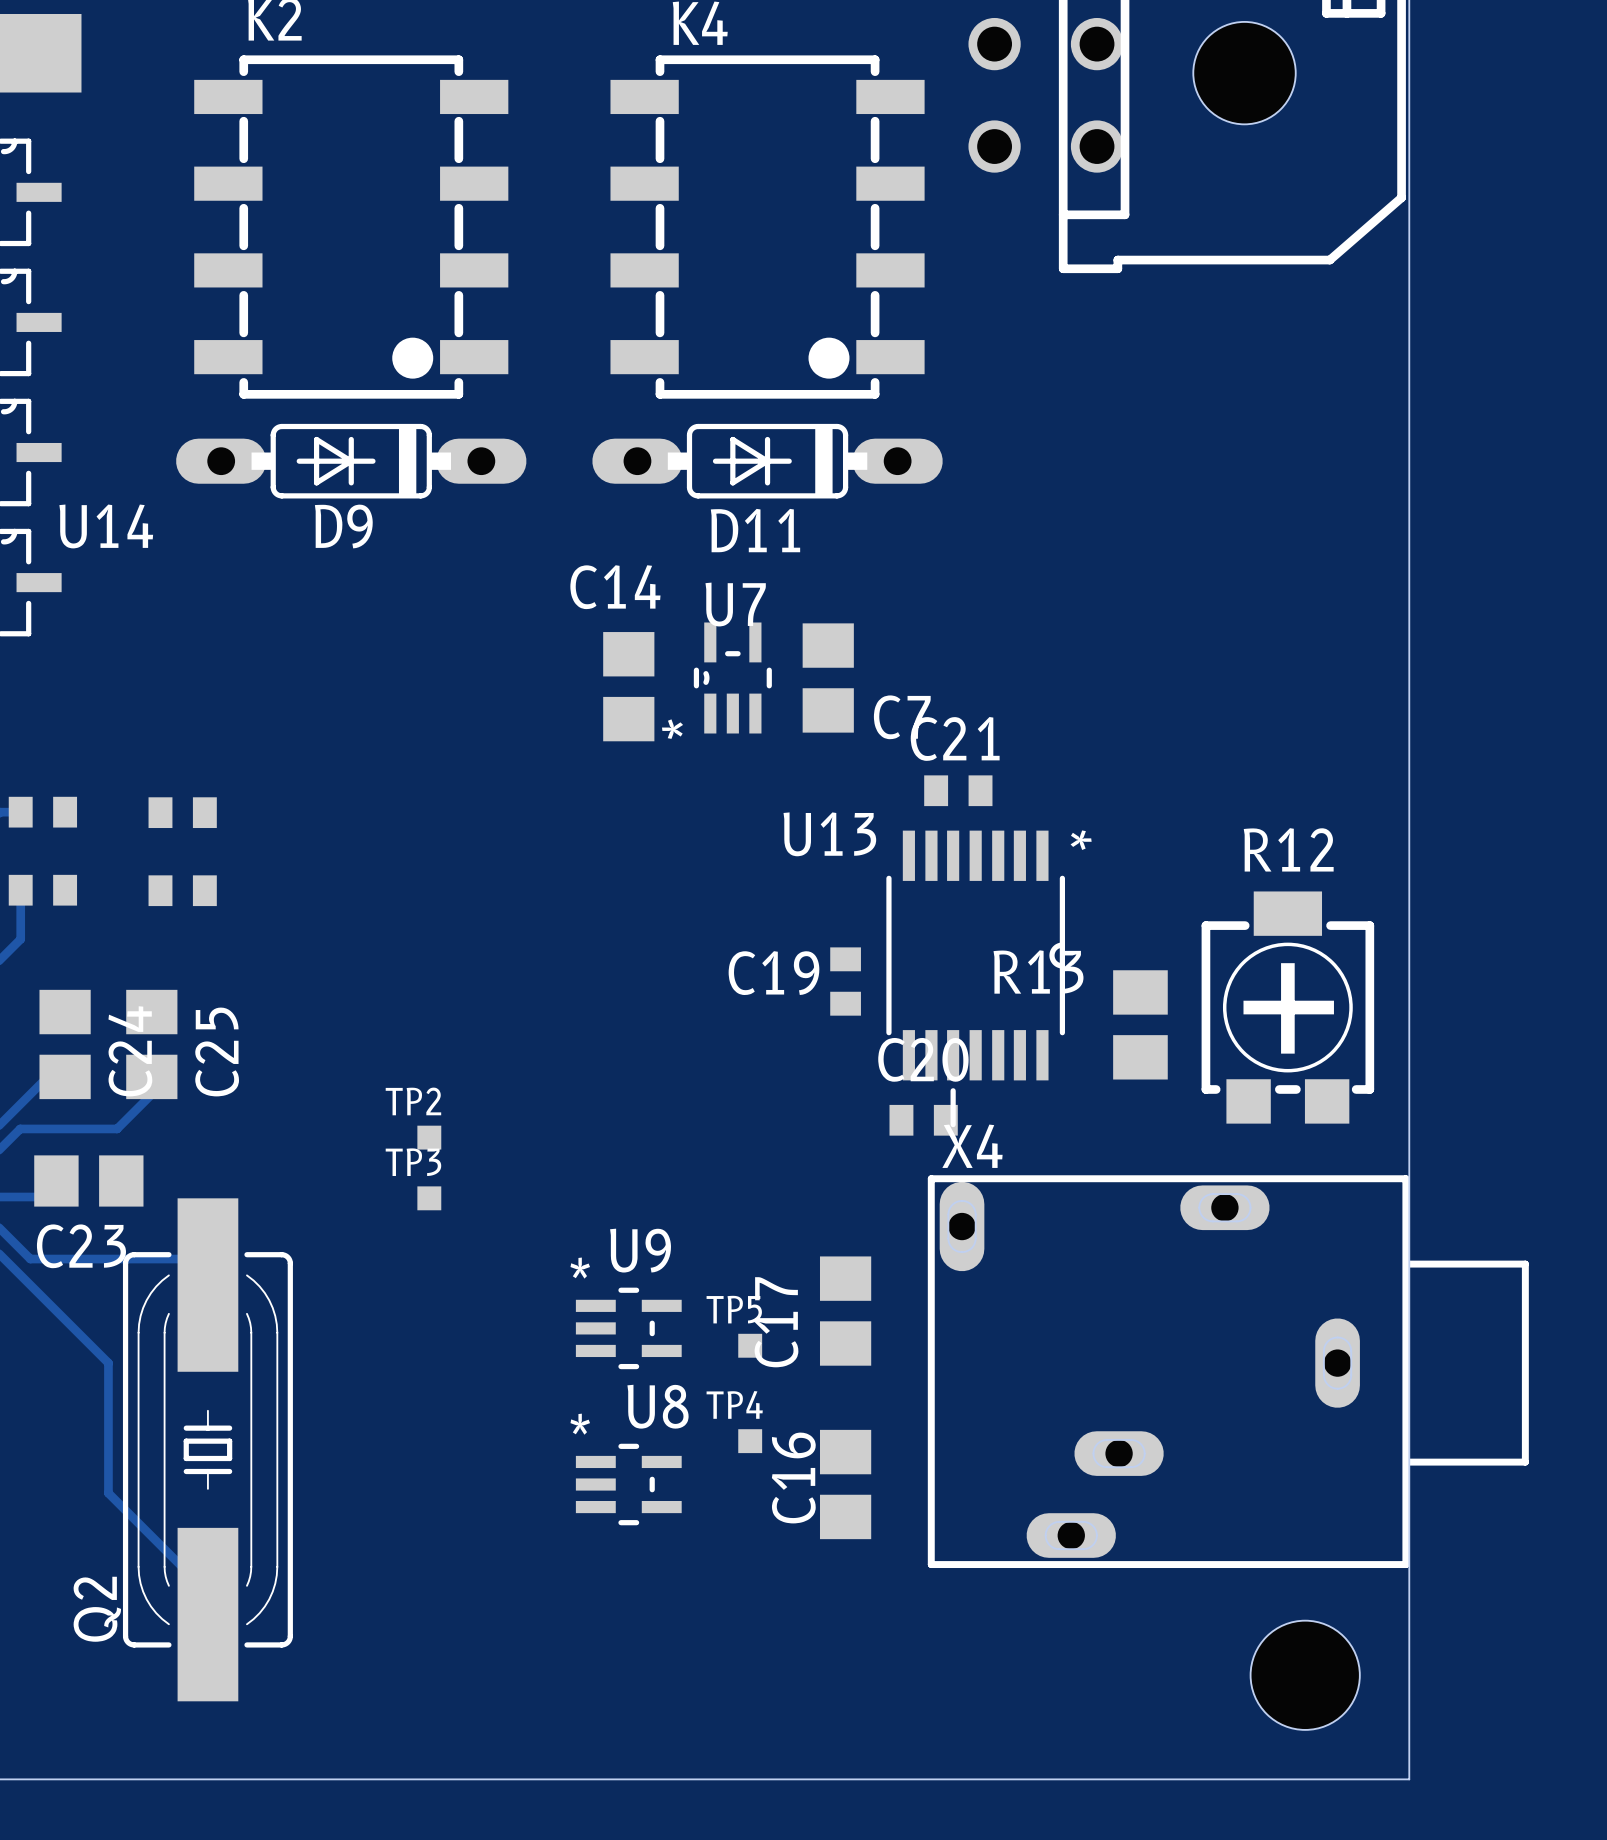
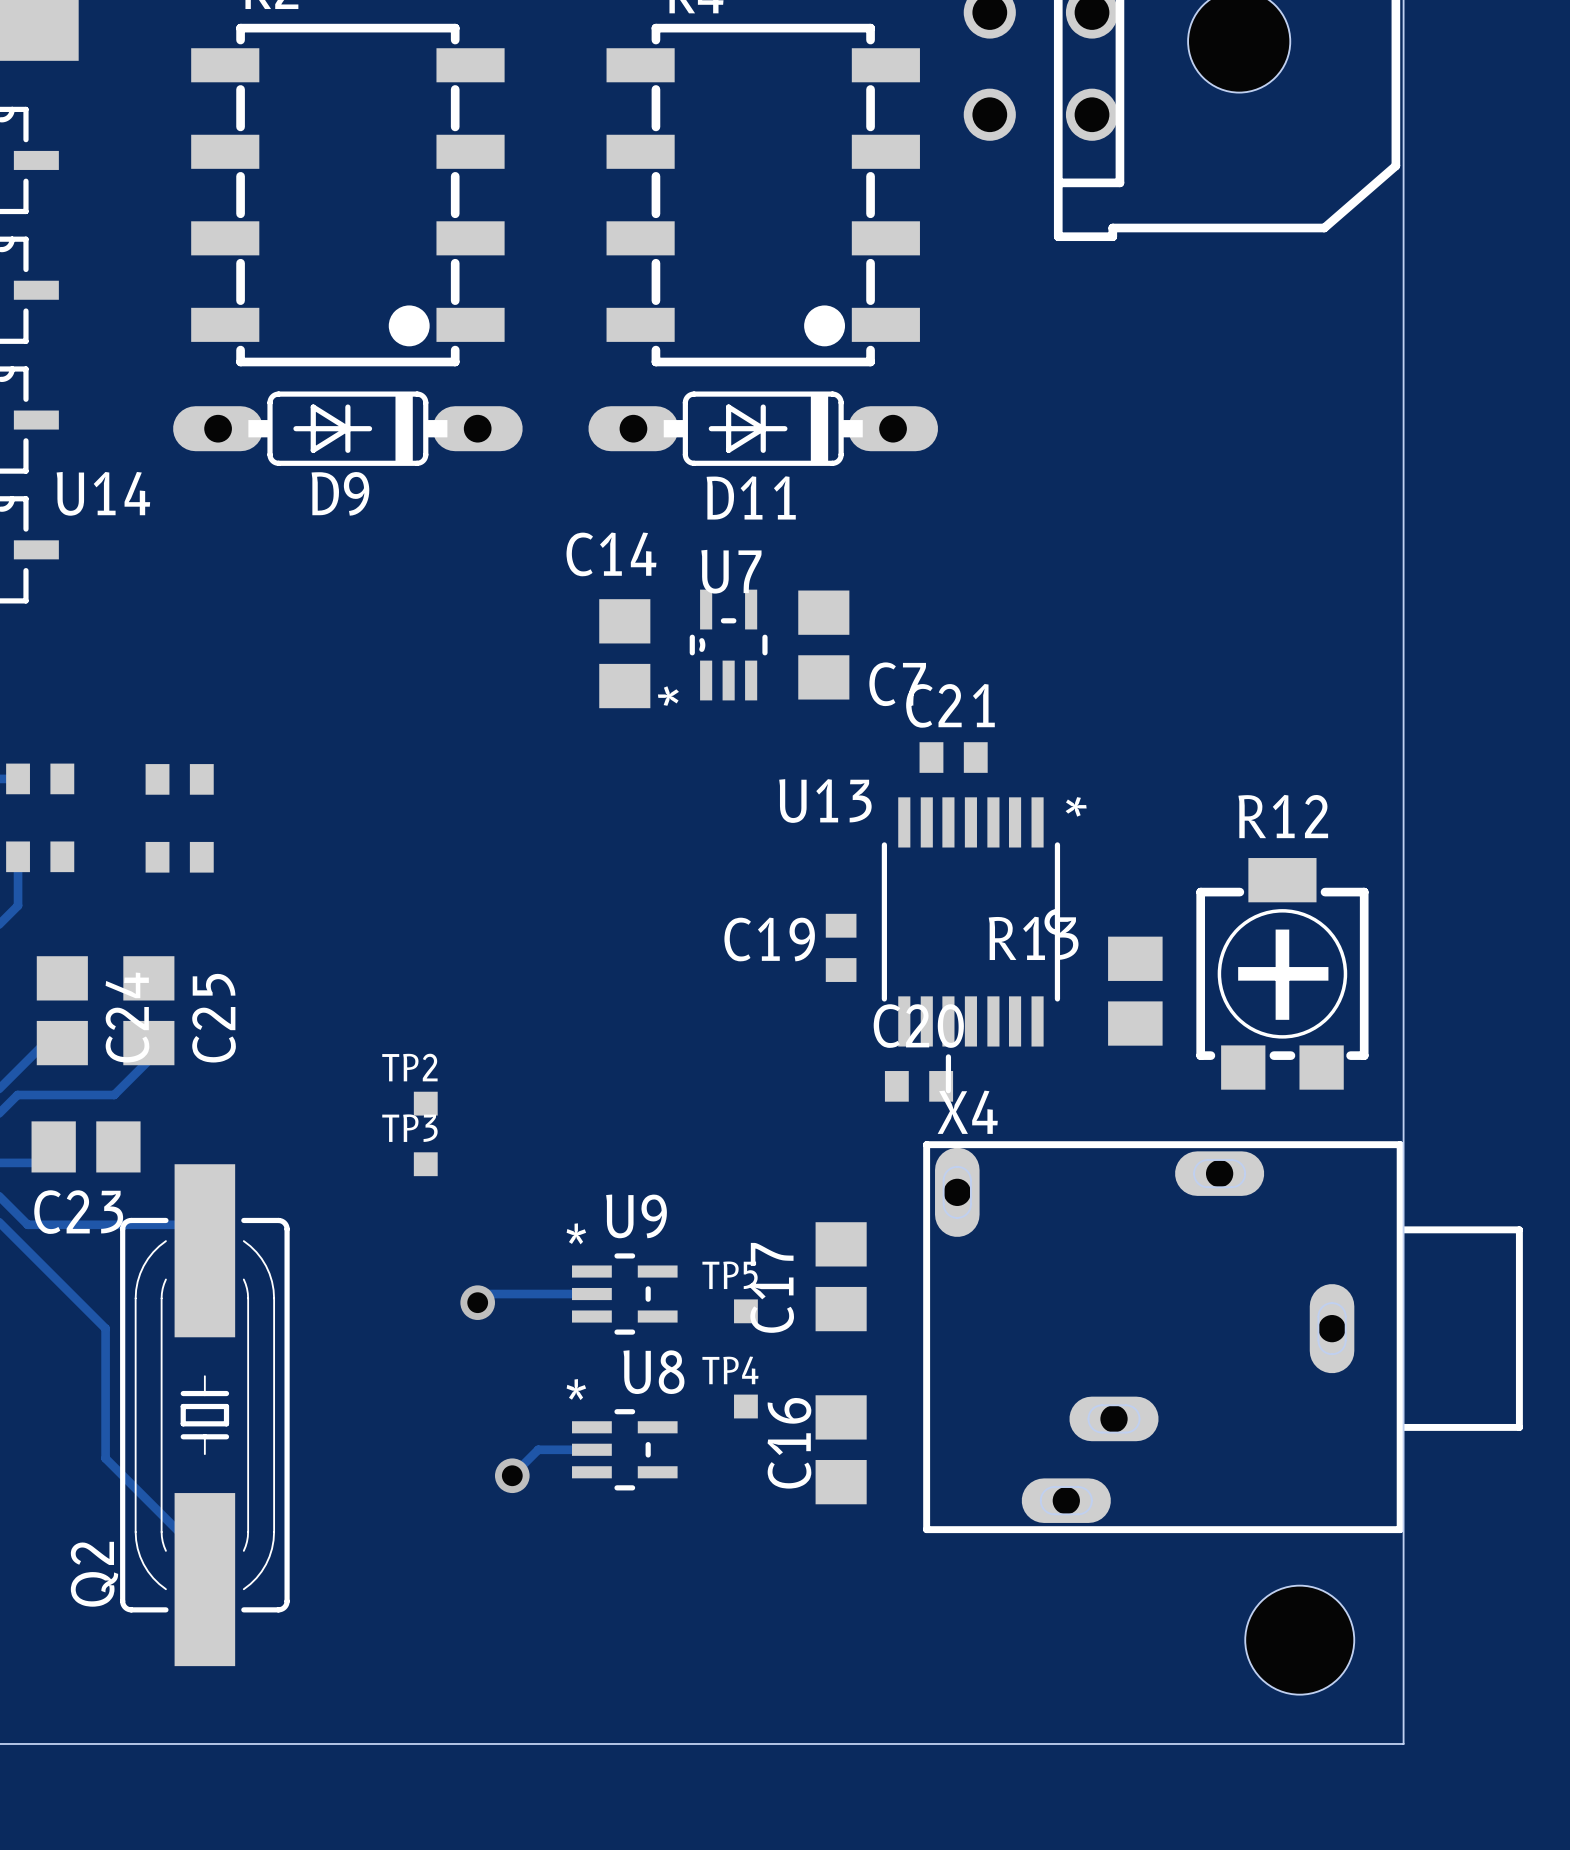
track: none -> (591, 1294) (486, 1294) (477, 1302)
via: none -> (477, 1302)
track: none -> (591, 1449) (538, 1449) (512, 1475)
via: none -> (512, 1475)

